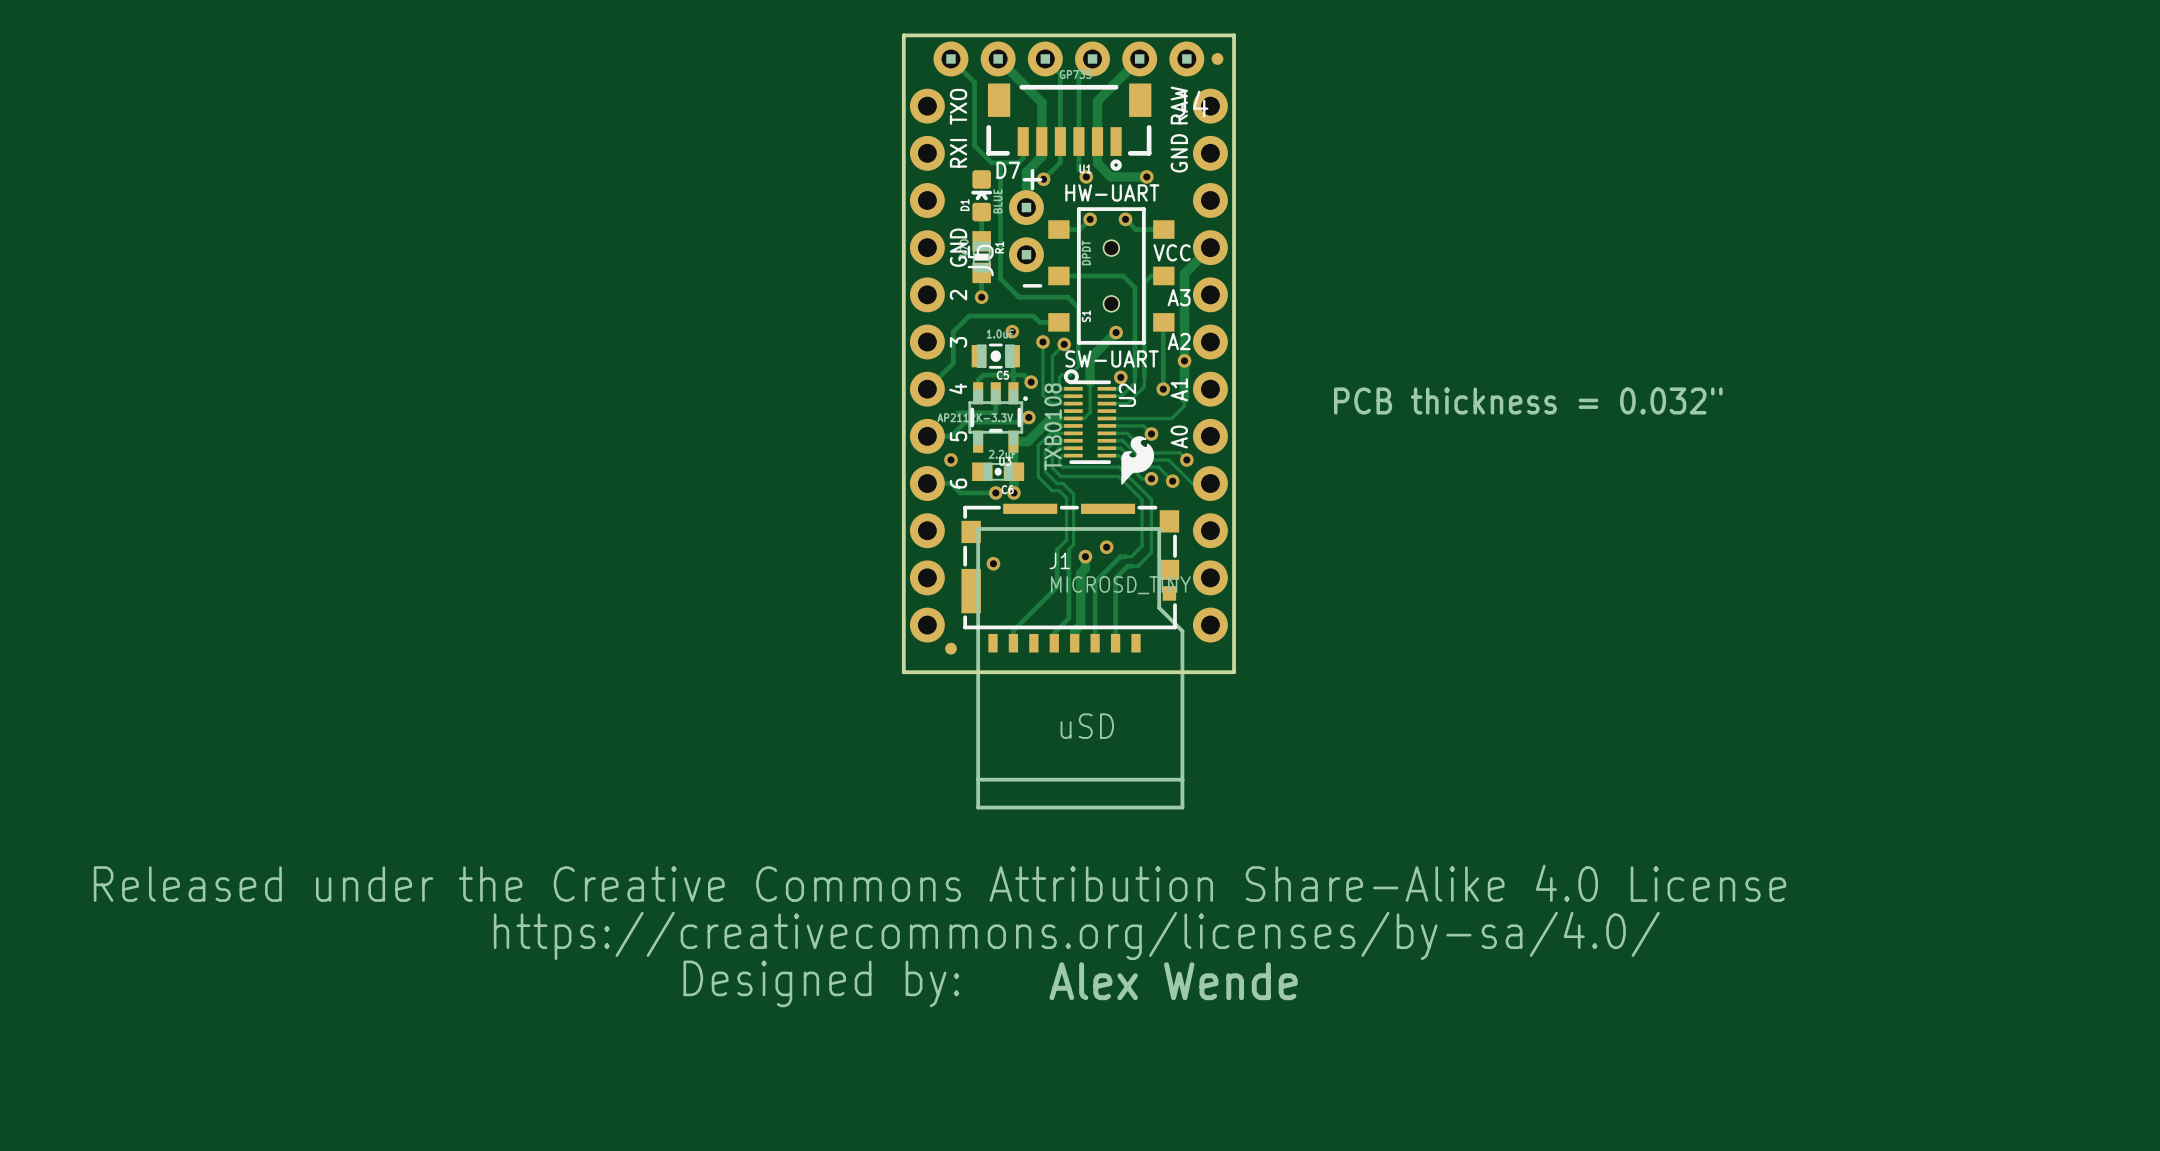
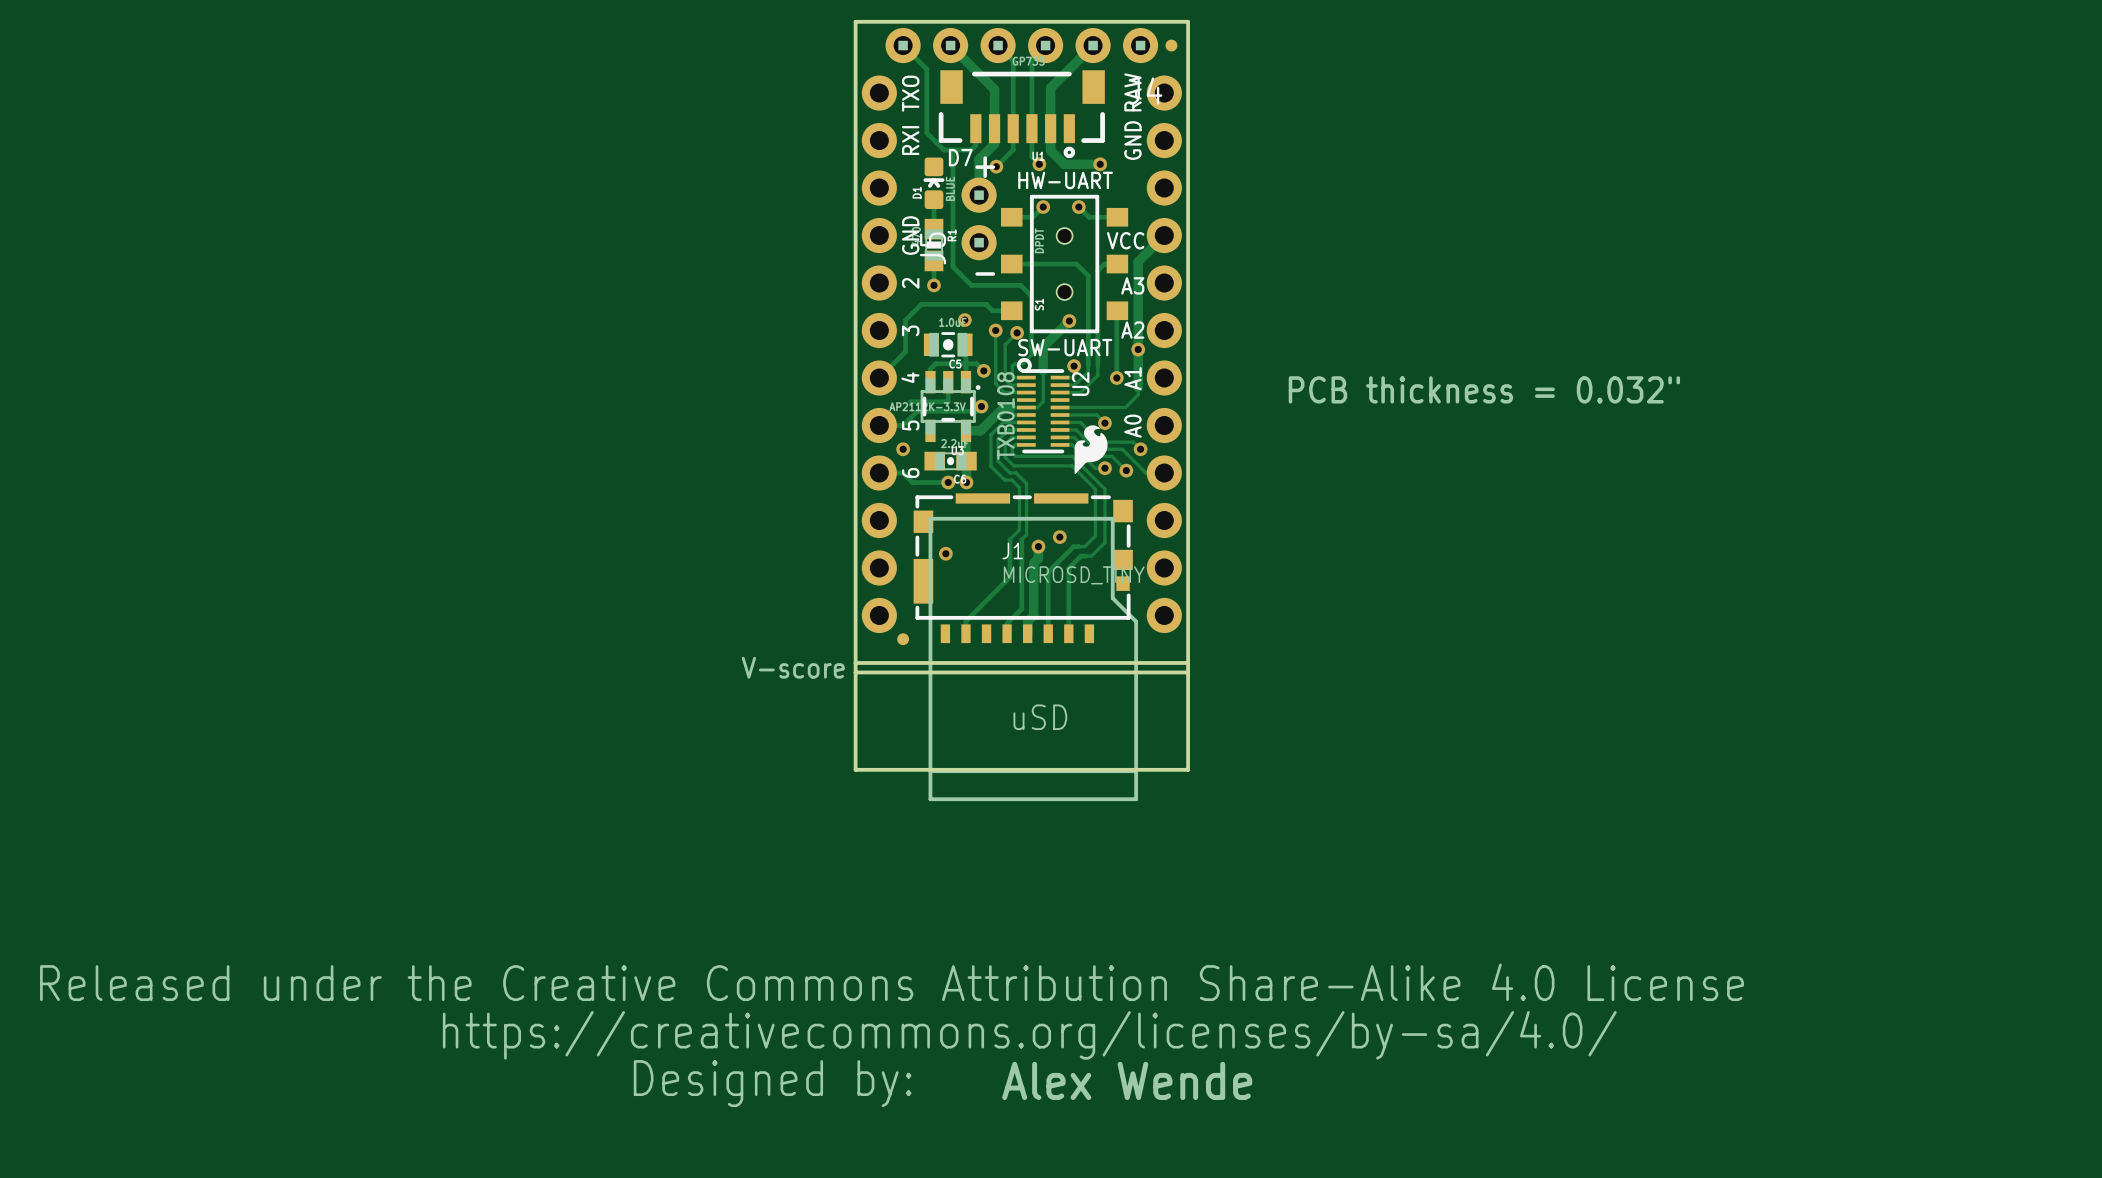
board edge: none -> (855, 662) (855, 769) (1188, 769) (1188, 662)
text: none -> V-score (793, 667)
board edge: none -> (855, 672) (1188, 672)
drawing position: (939, 935) -> (892, 1035)
text position: Alex Wende (1173, 981) -> Alex Wende (1127, 1080)

